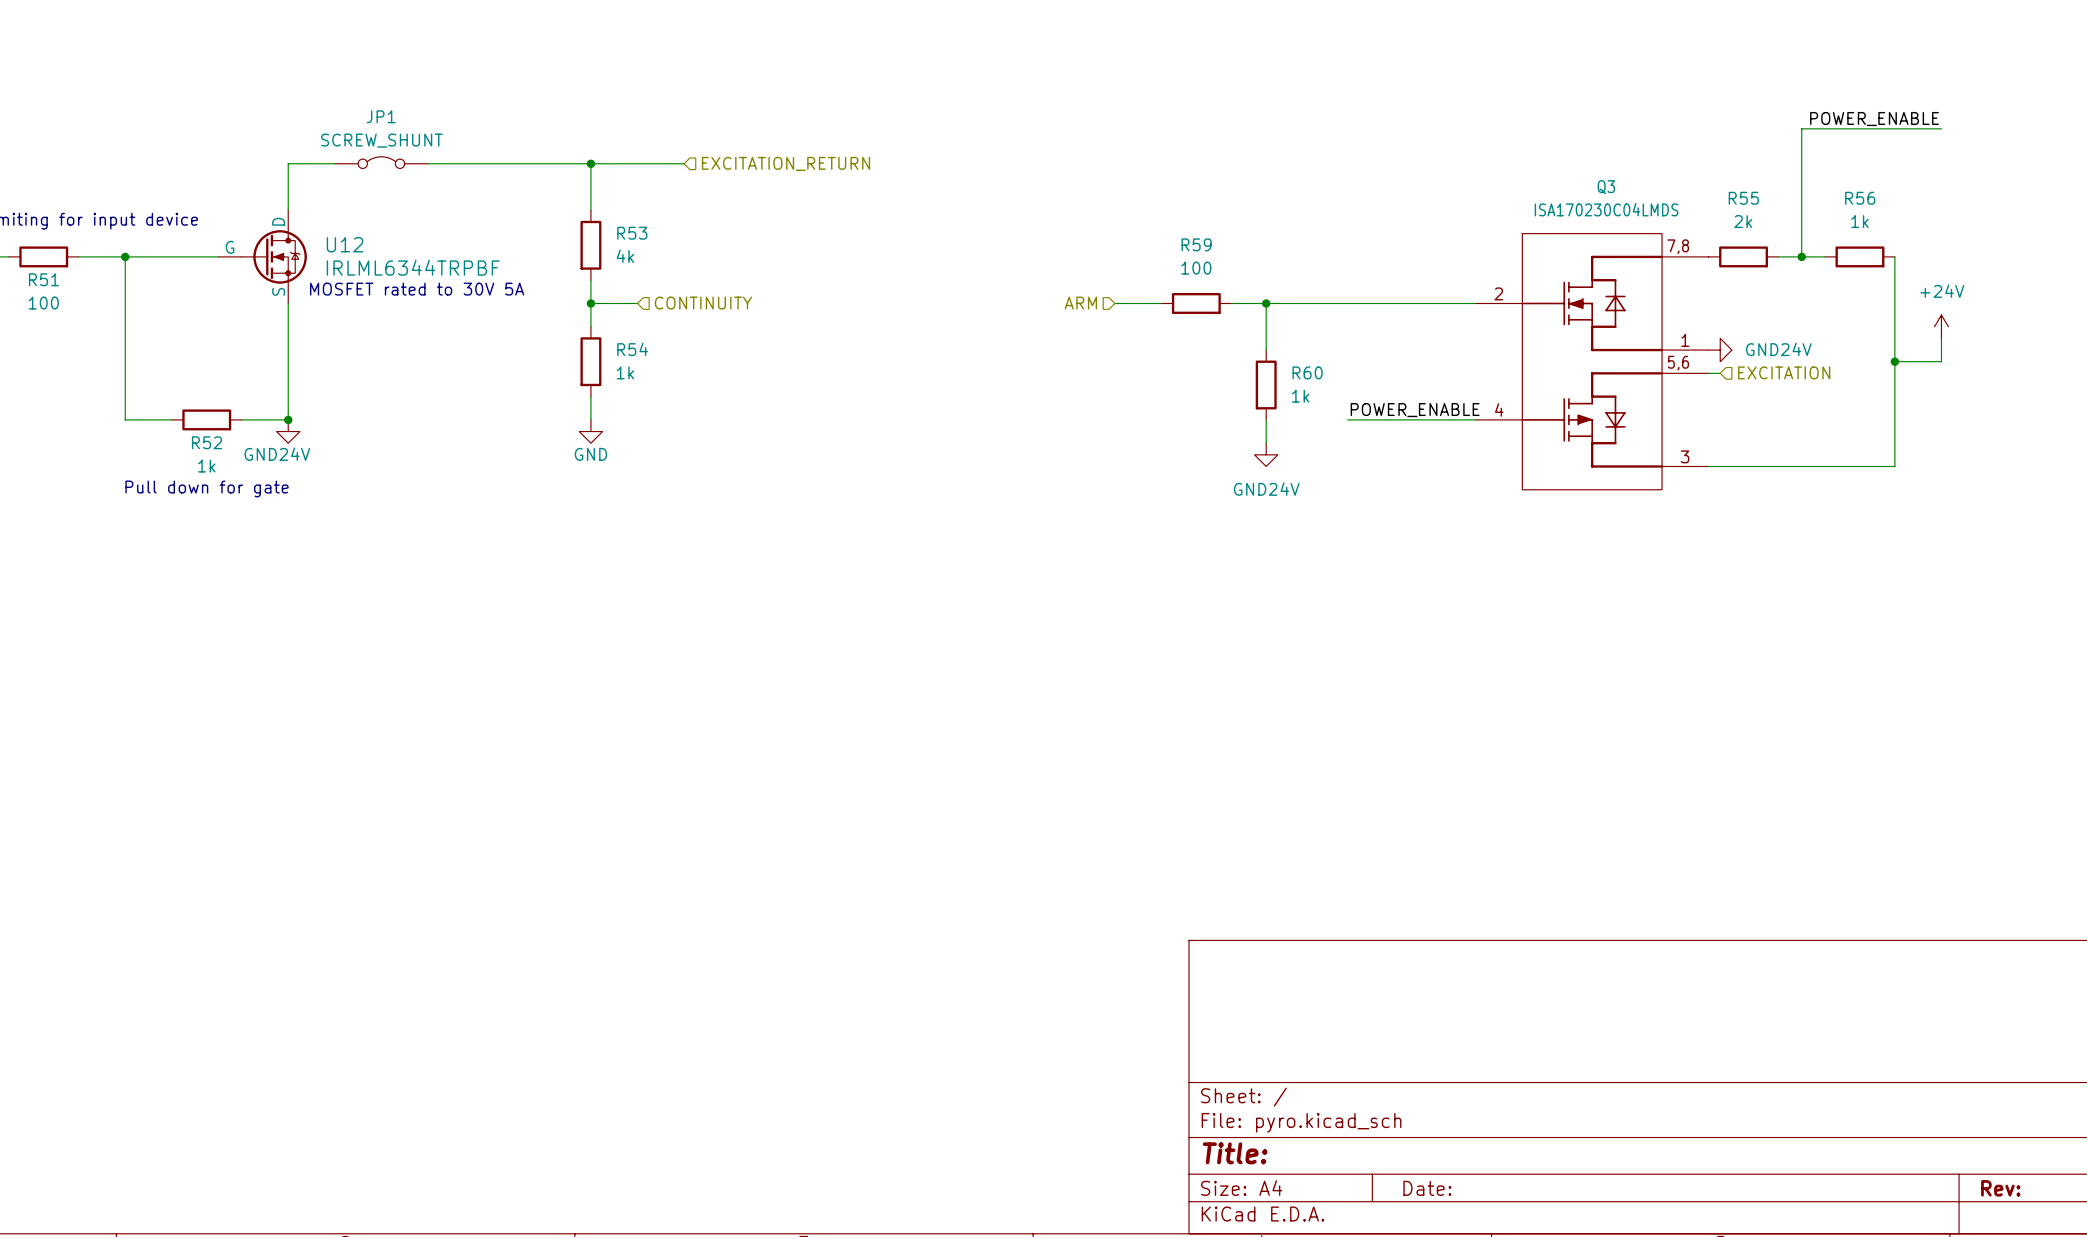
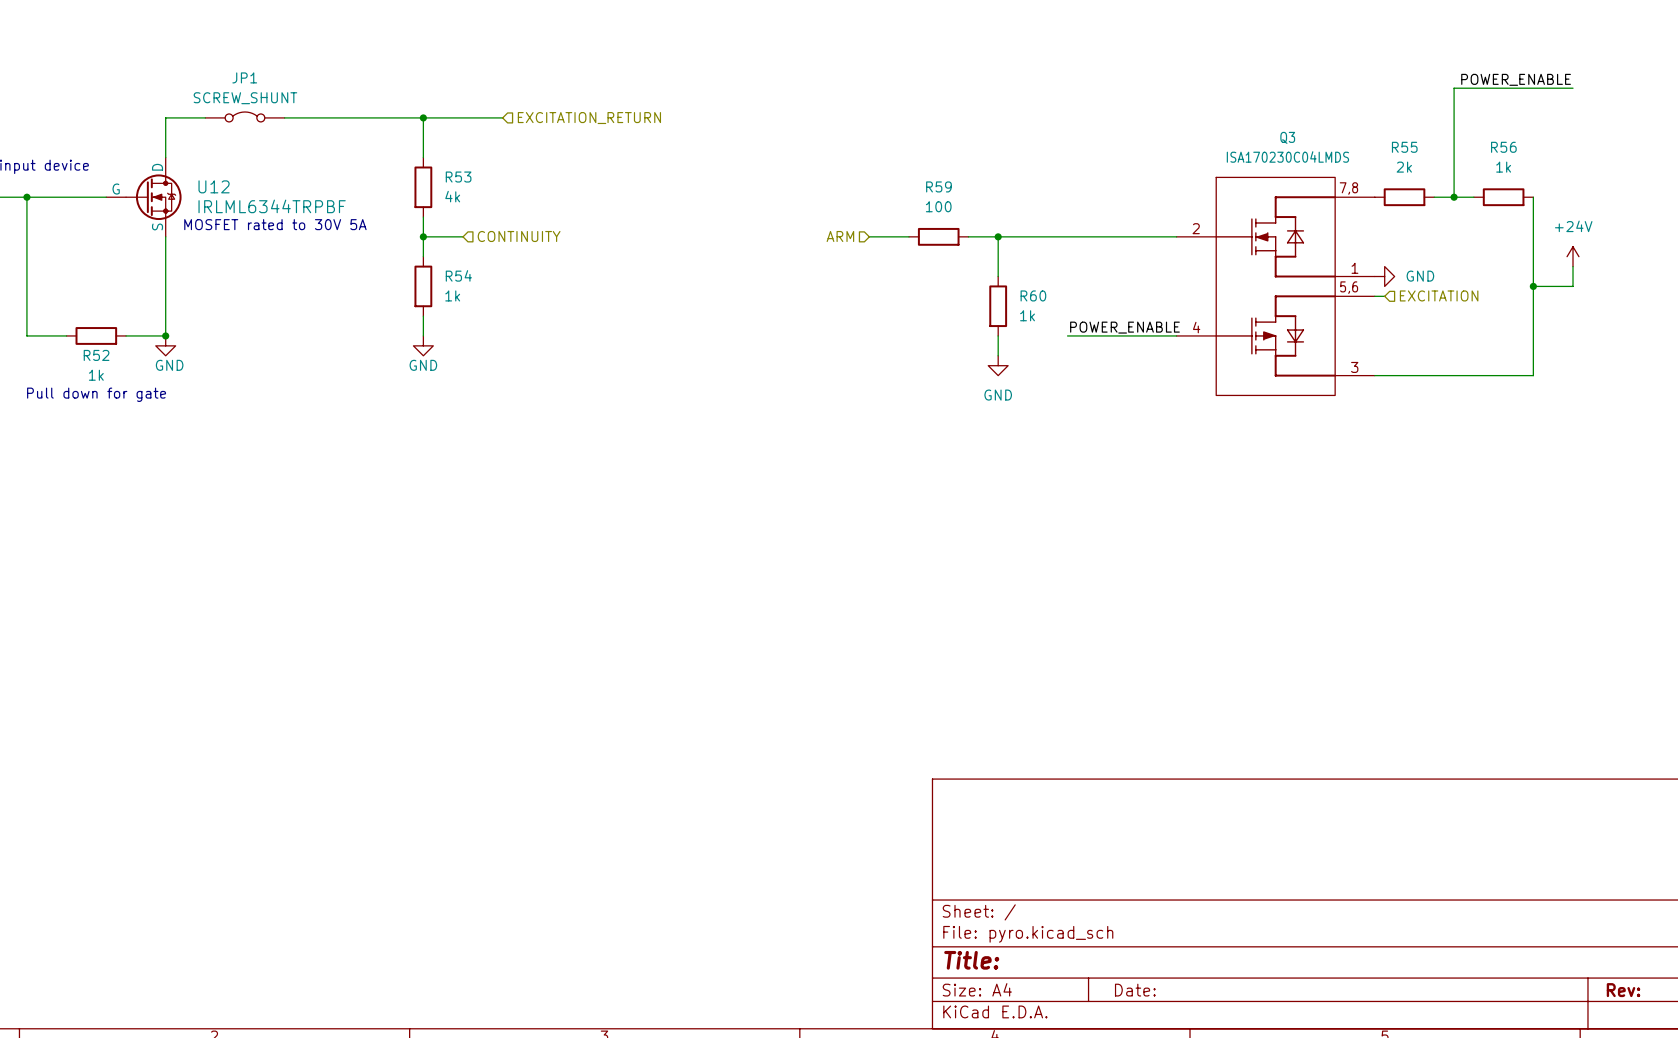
power symbol: GND24V (1720, 350) -> GND (1384, 276)
power symbol: GND24V (288, 431) -> GND (165, 345)
power symbol: GND24V (1266, 454) -> GND (998, 365)

